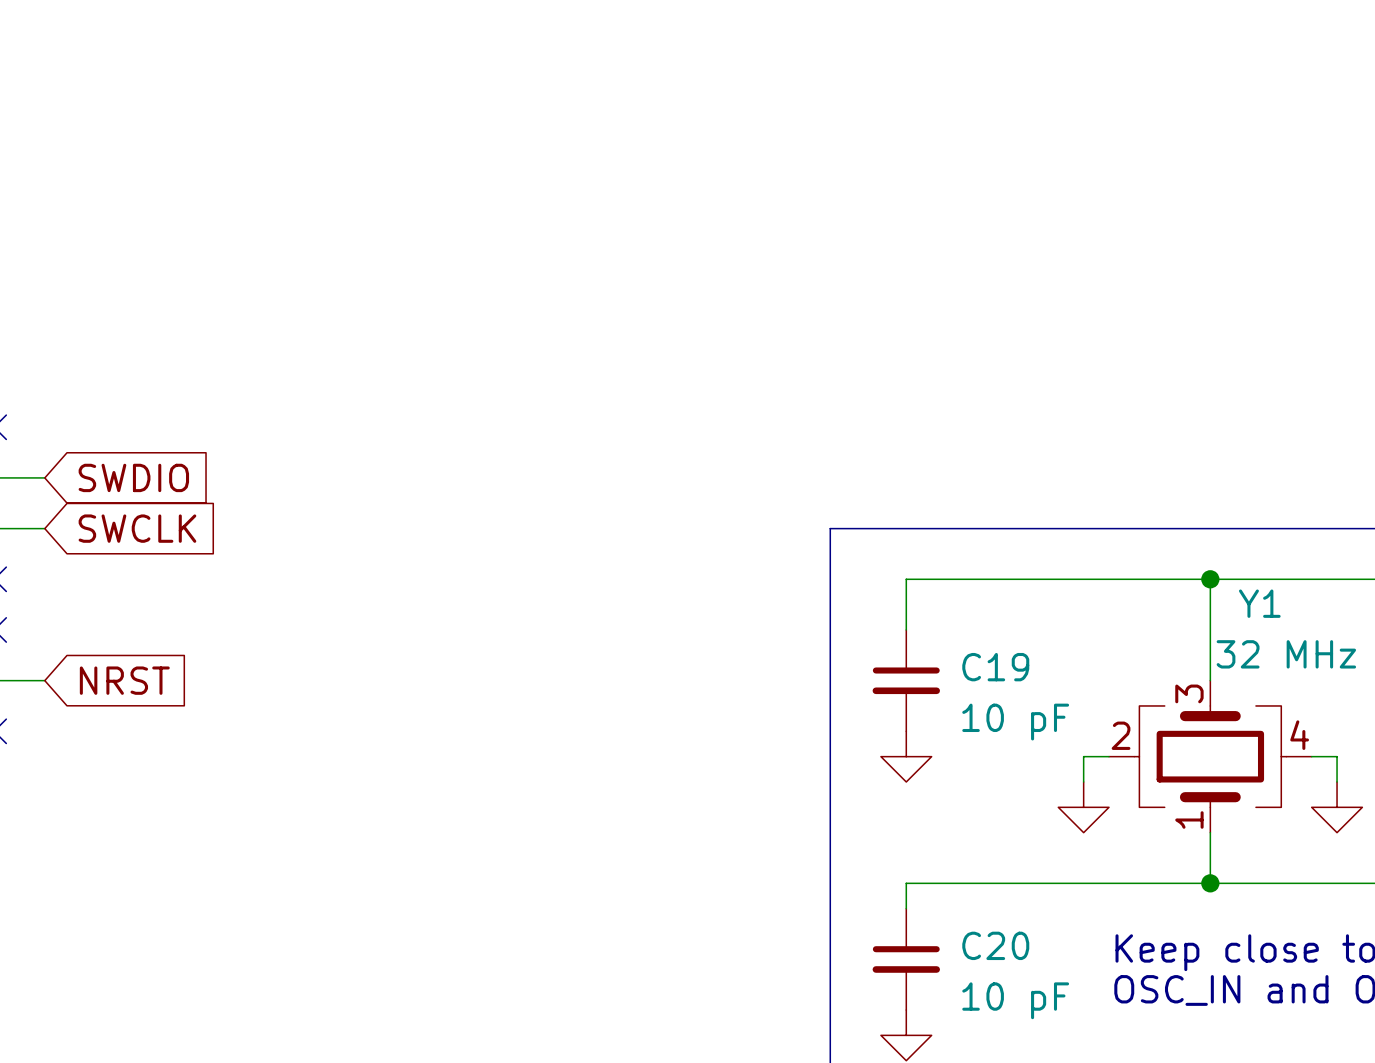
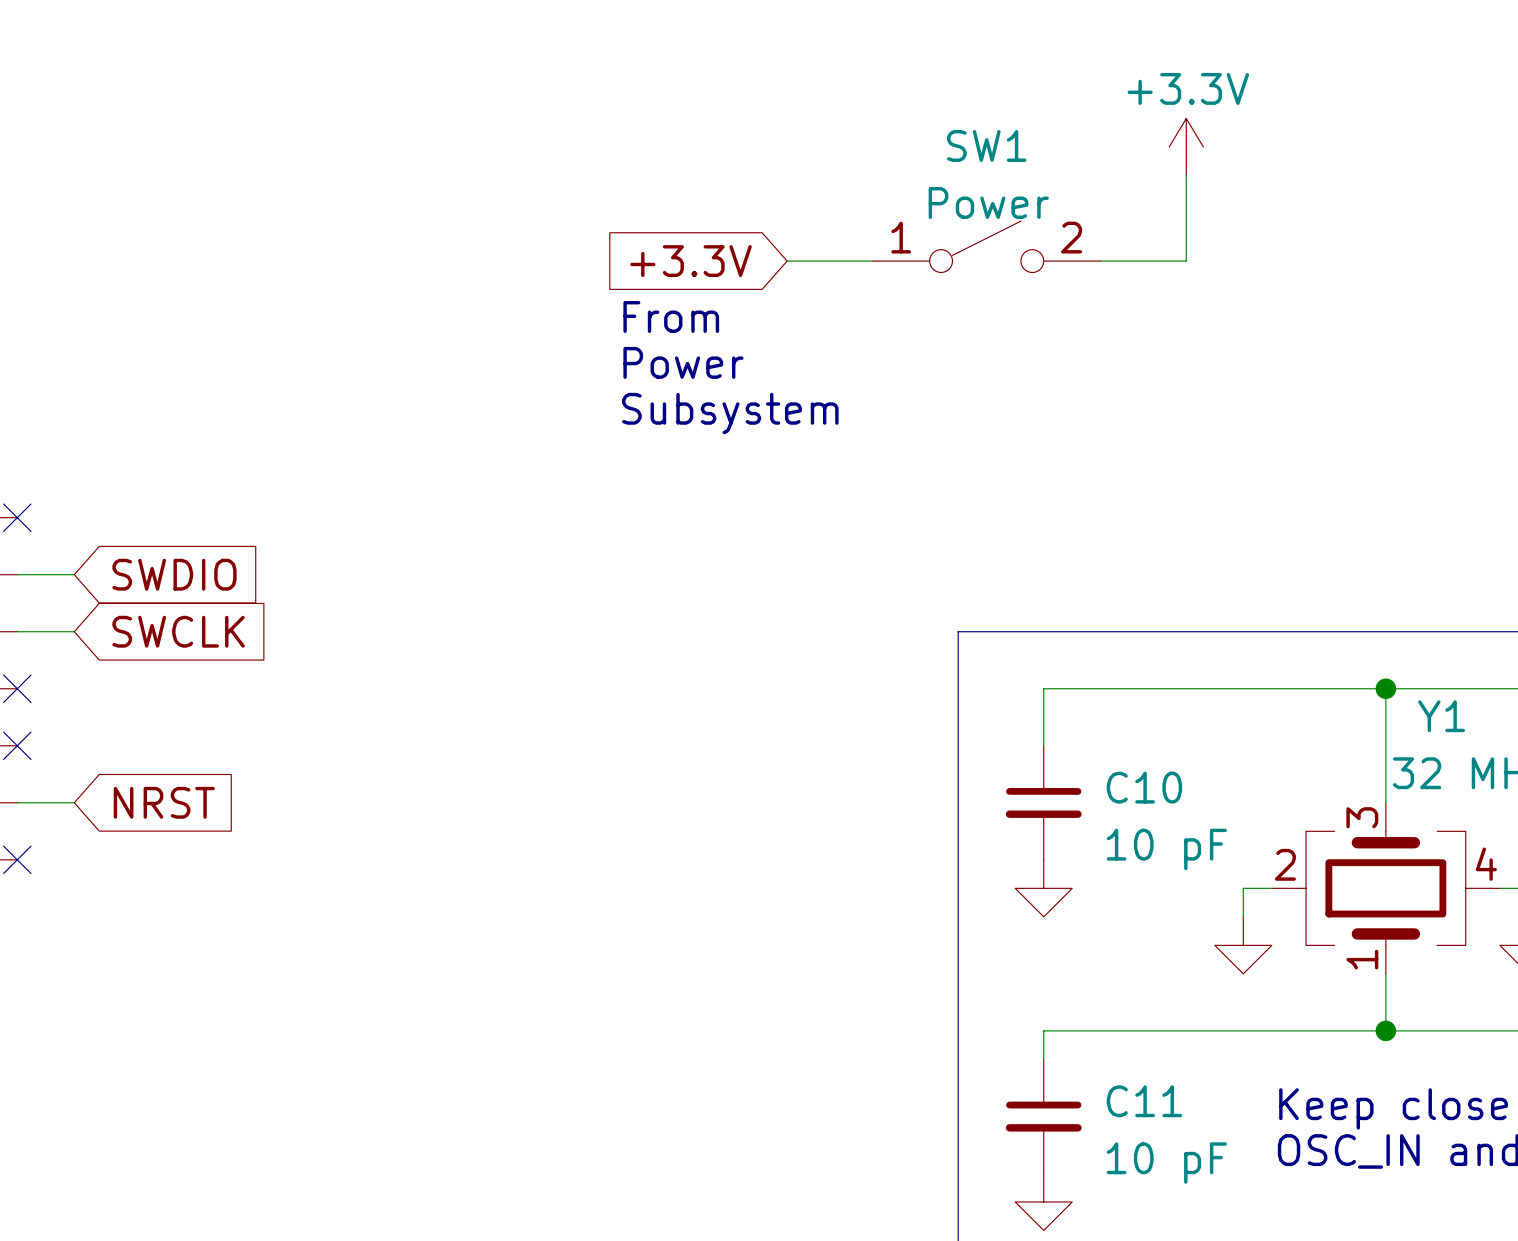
power symbol: none -> +3.3V (1186, 147)
wire: none -> (1186, 175) (1186, 261) (1100, 261)
SW1: none -> Power (986, 246)
global label: none -> +3.3V (691, 261)
wire: none -> (787, 261) (872, 261)
text: none -> From (671, 316)
text: none -> Power (683, 362)
text: none -> Subsystem (730, 413)
C19 name: C19 (995, 667) -> C10 (1144, 787)
C20 name: C20 (995, 945) -> C11 (1144, 1101)

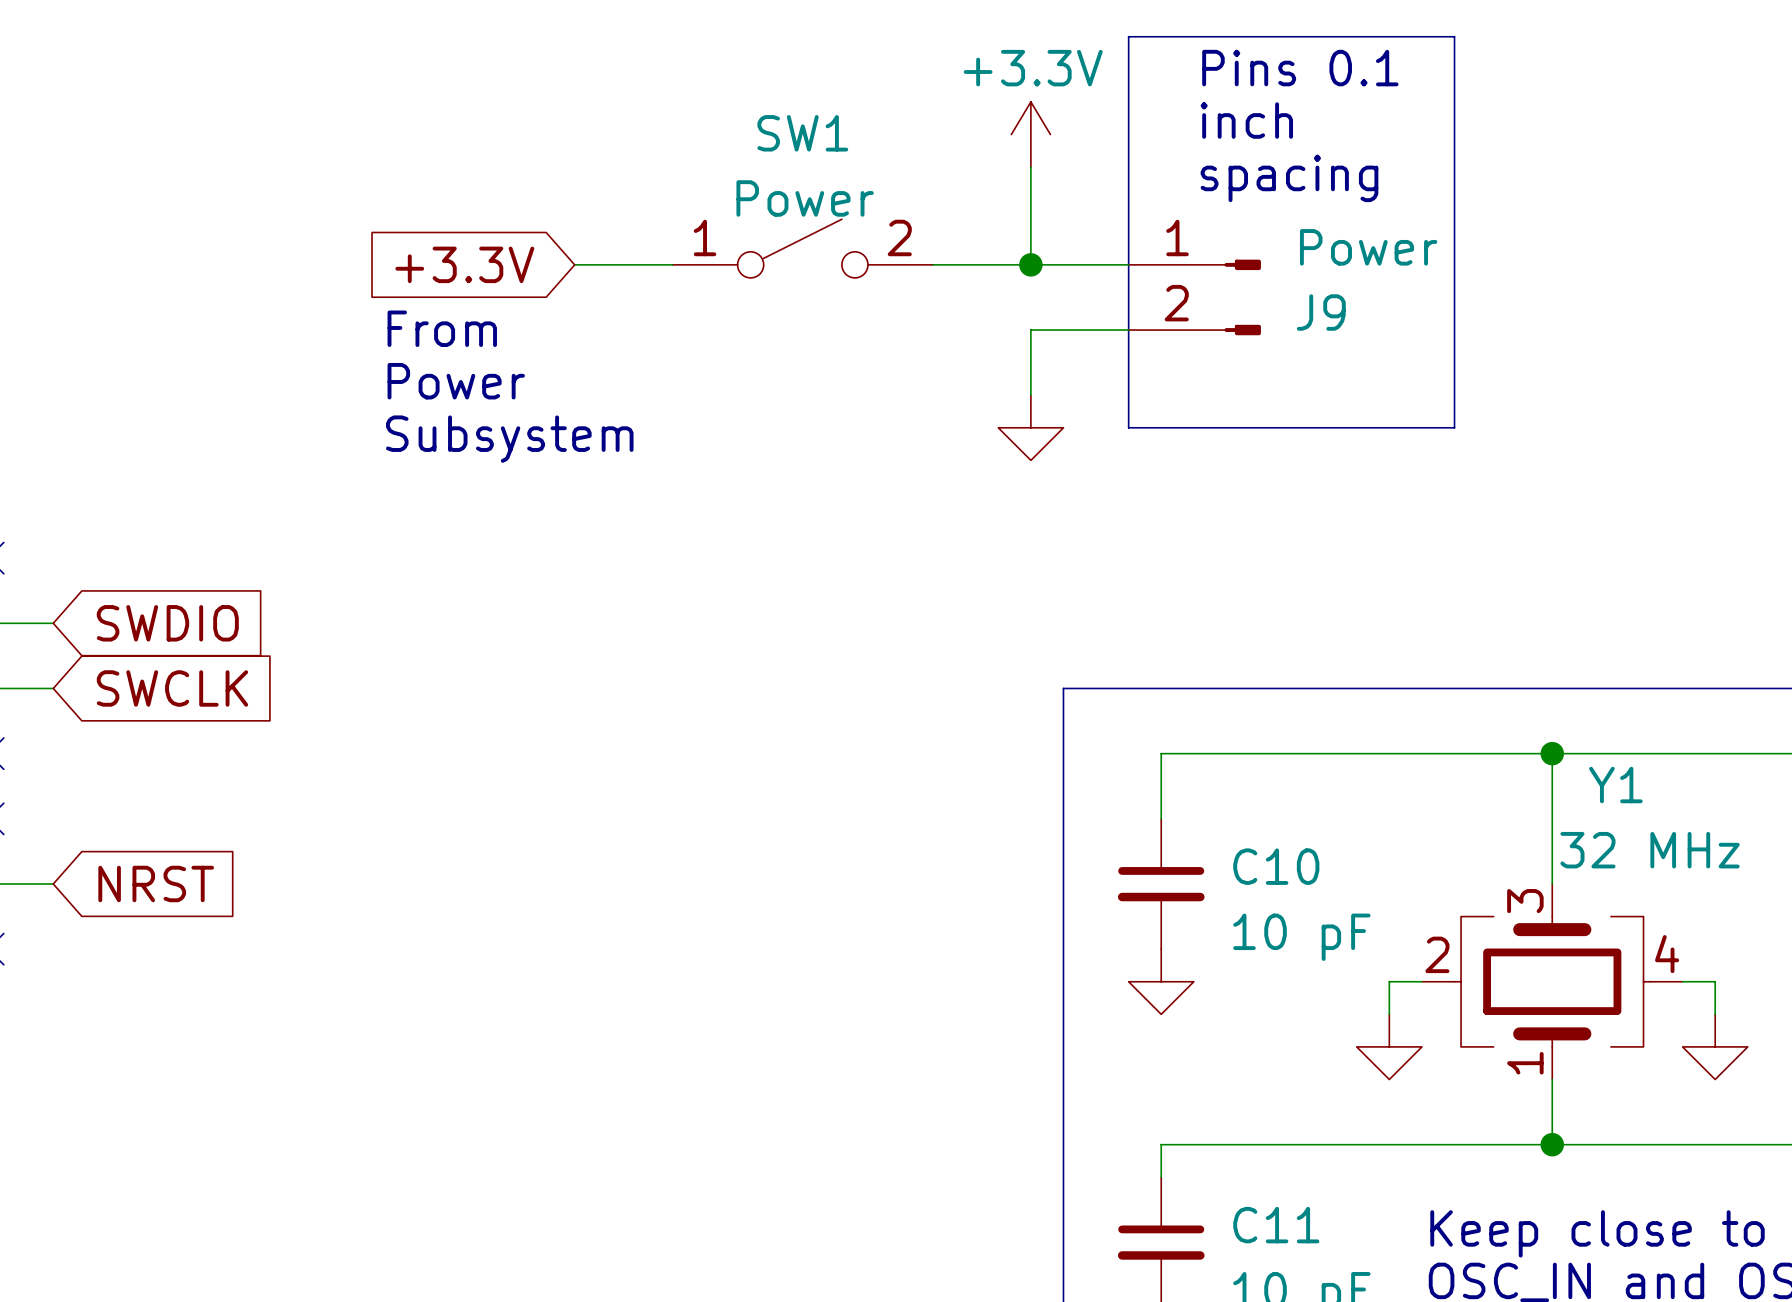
line: none -> (1128, 36) (1454, 36) (1454, 427) (1128, 427) (1128, 36)
text: none -> Pins 0.1 (1300, 68)
text: none -> inch (1246, 120)
power symbol position: +3.3V (1186, 147) -> +3.3V (1030, 134)
wire: none -> (1030, 167) (1030, 264)
wire: (1186, 175) (1186, 261) (1100, 261) -> none
text: none -> spacing (1289, 178)
SW1 position: (986, 246) -> (802, 248)
wire: none -> (574, 264) (672, 264)
global label position: +3.3V (691, 261) -> +3.3V (464, 264)
wire: none -> (965, 264) (1128, 264)
junction: none -> (1030, 264)
J9: none -> Power (1194, 297)
text position: From (671, 316) -> From (442, 328)
wire: none -> (1128, 330) (1030, 330) (1030, 395)
text position: Power (683, 362) -> Power (456, 381)
power symbol: none -> (1030, 427)
text position: Subsystem (730, 413) -> Subsystem (509, 439)

